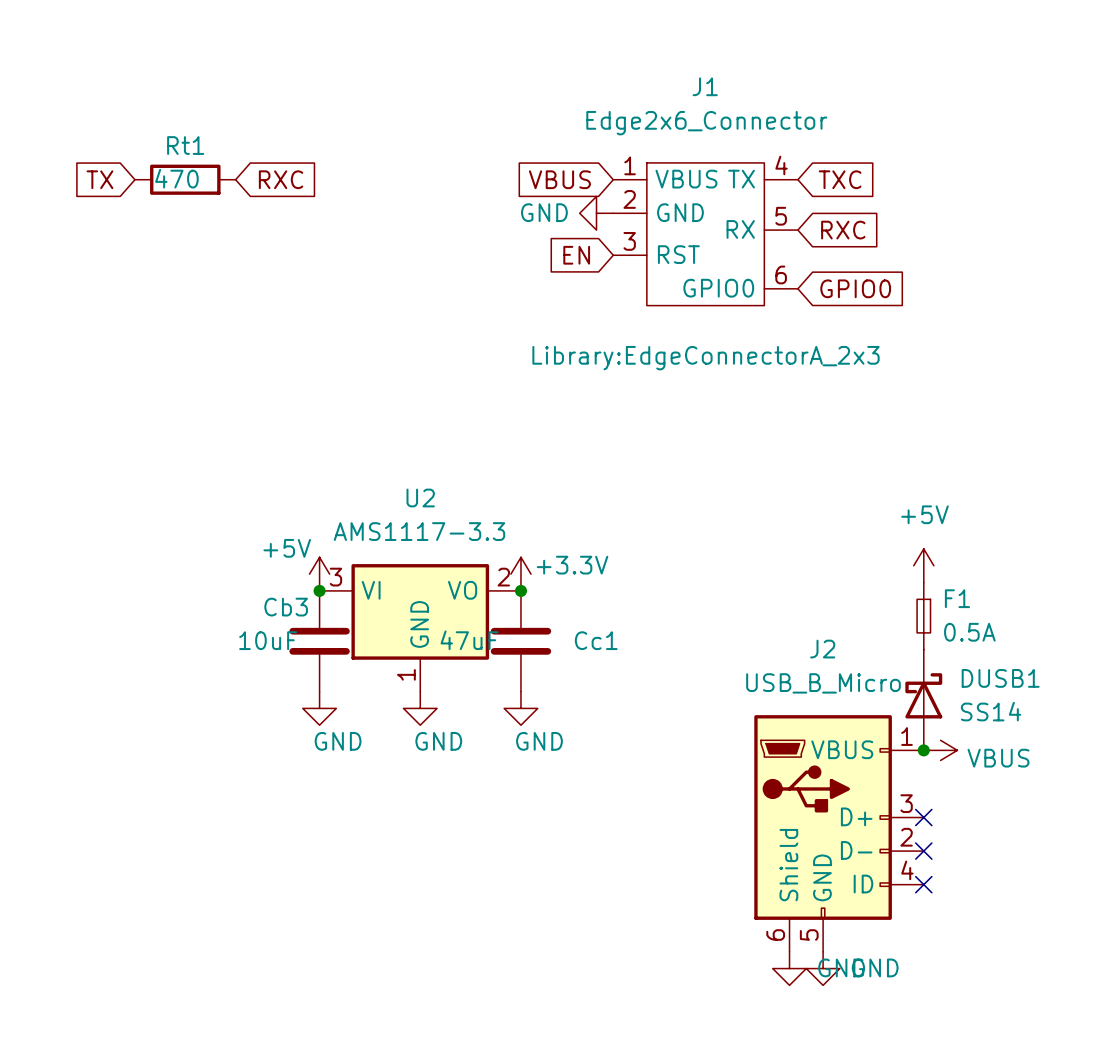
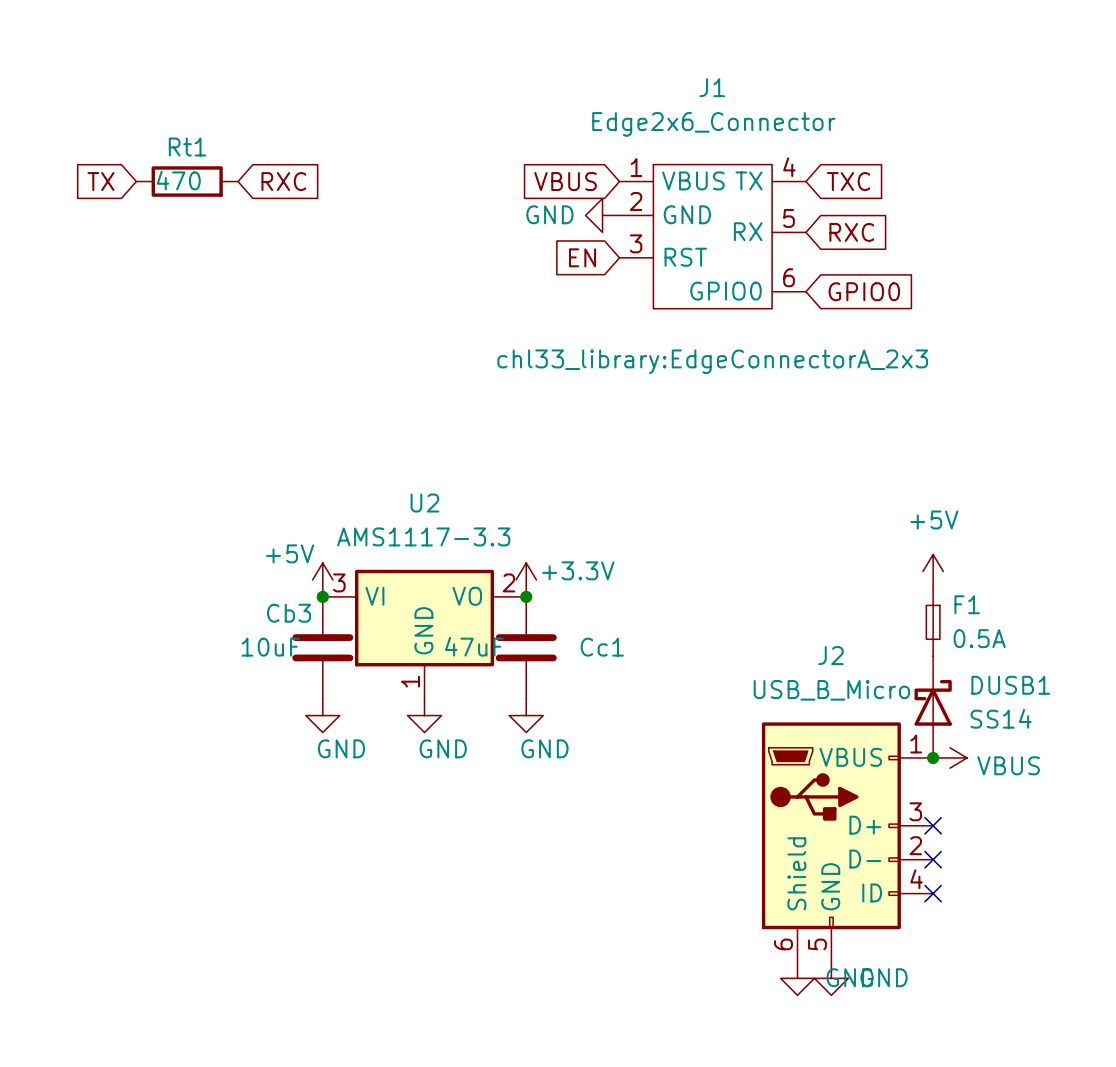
J1 text: Library:EdgeConnectorA_2x3 (706, 358) -> chl33_library:EdgeConnectorA_2x3 (712, 361)

